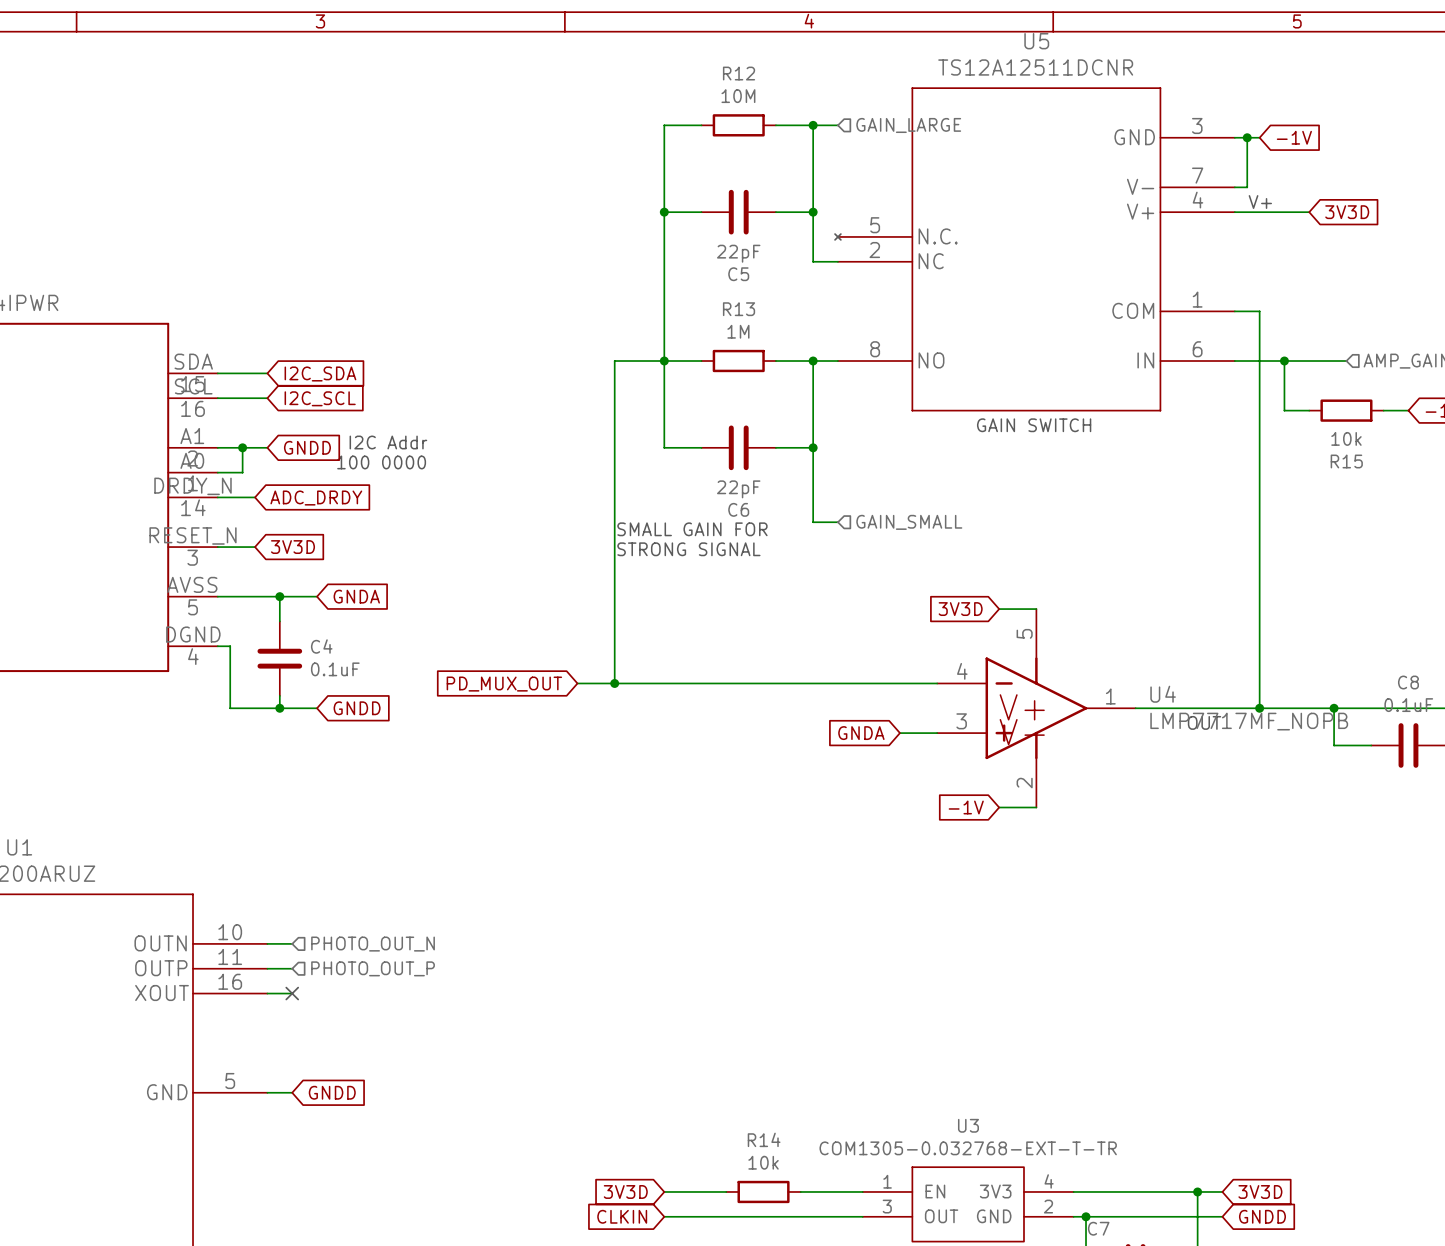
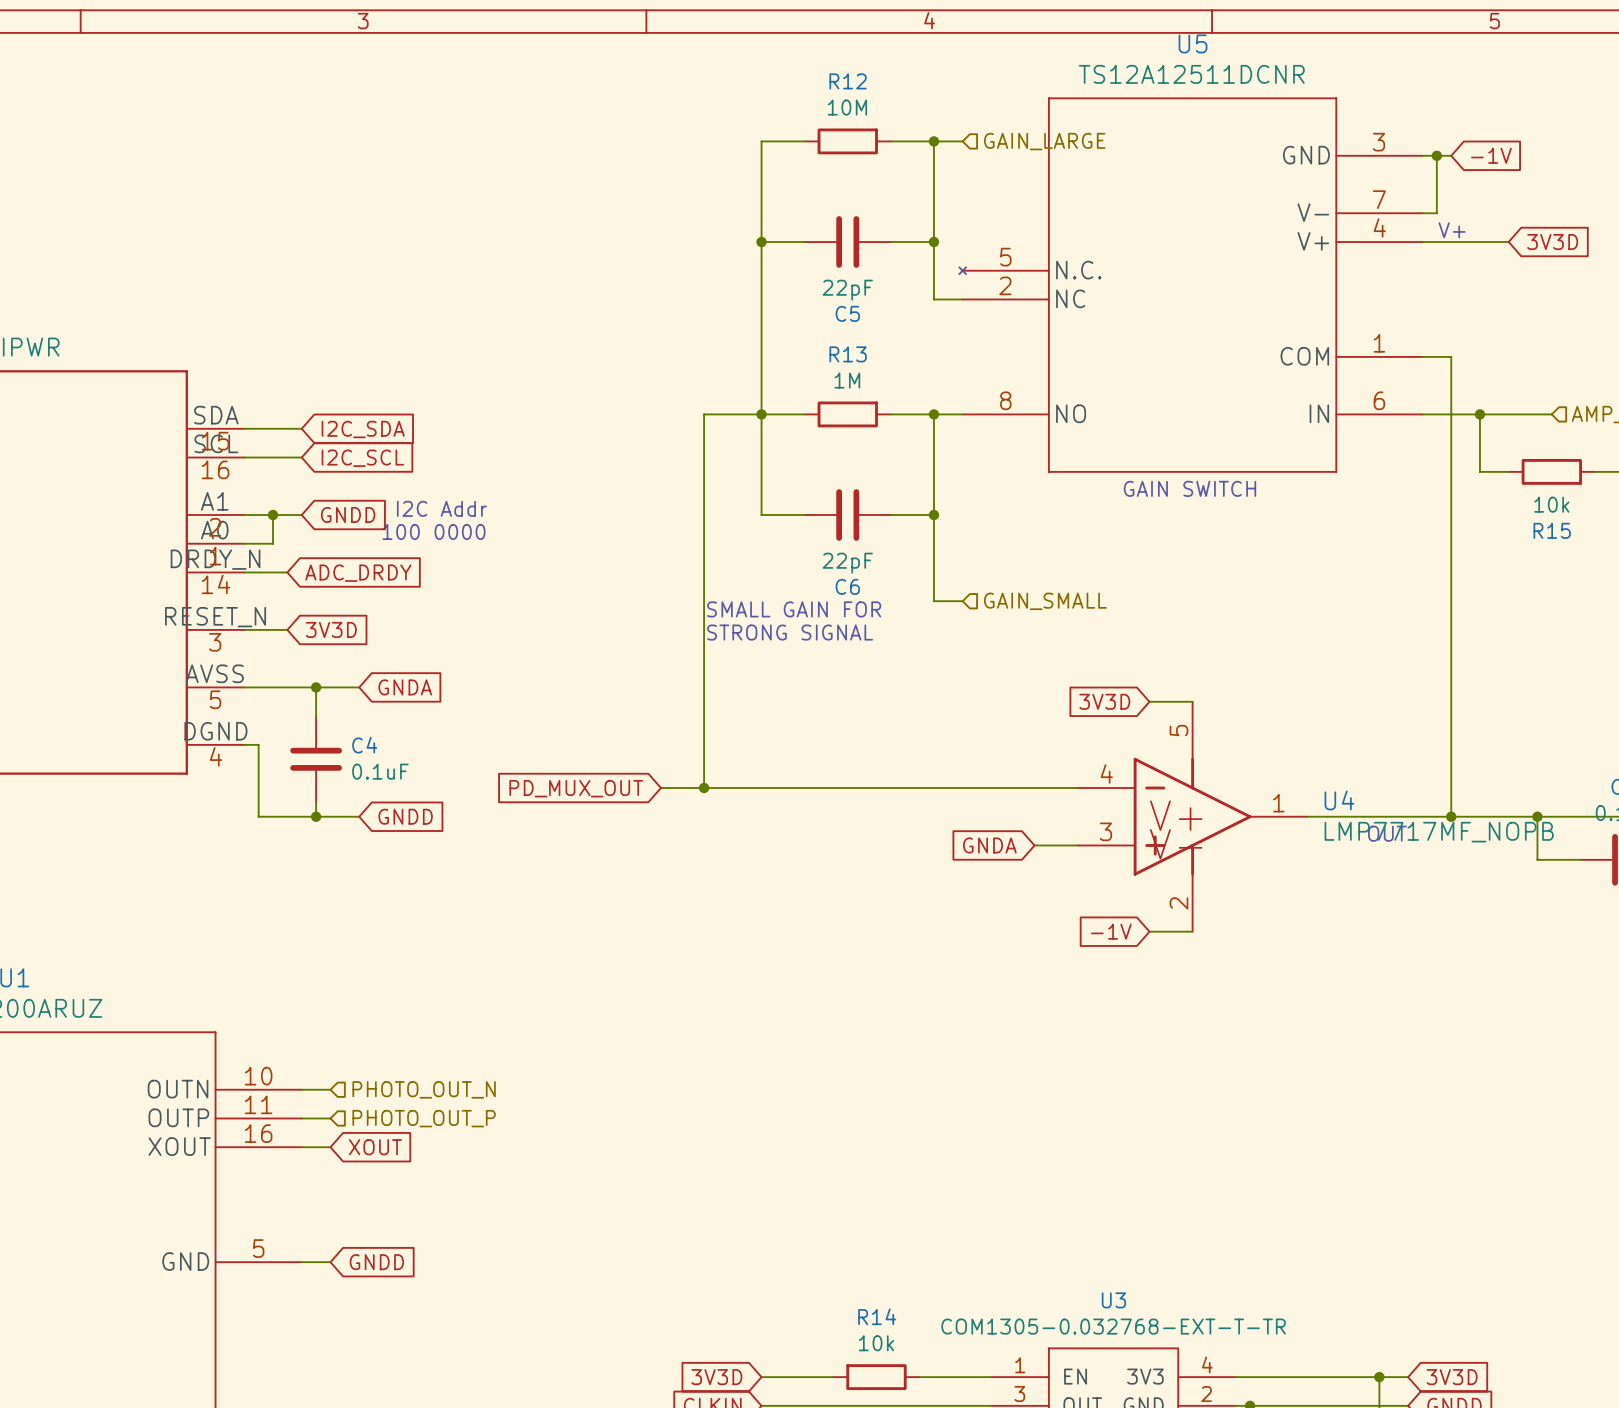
no-connect mark: (292, 993) -> none
global label: none -> XOUT (375, 1147)

